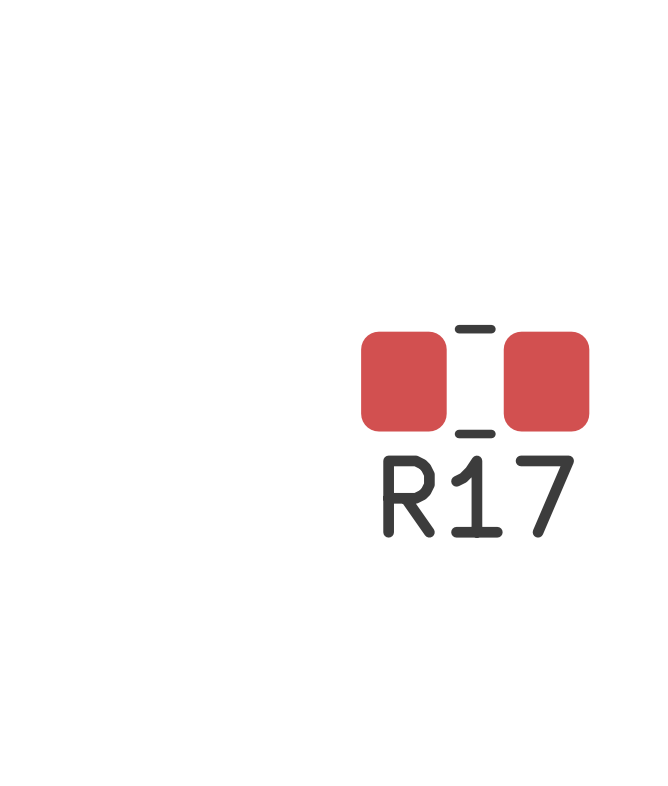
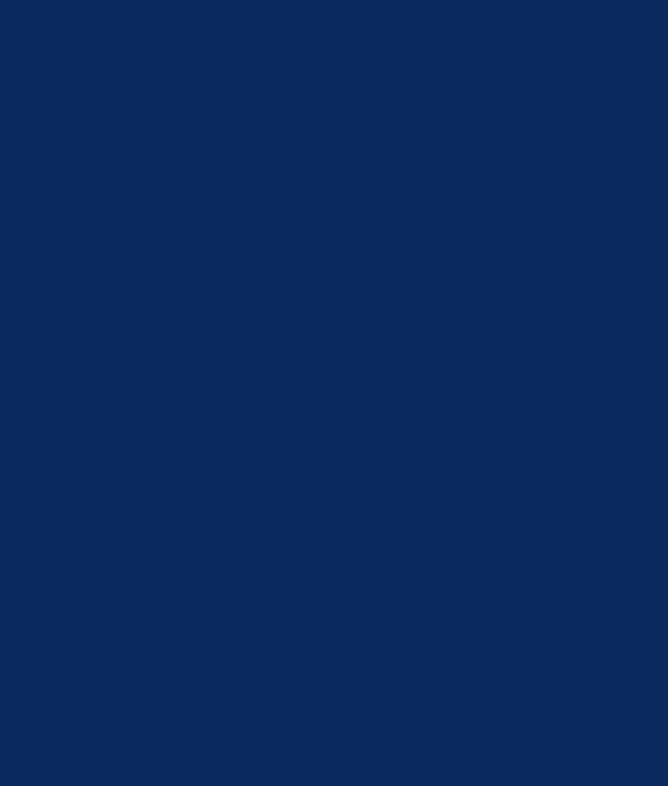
R17: (475, 381) -> none

